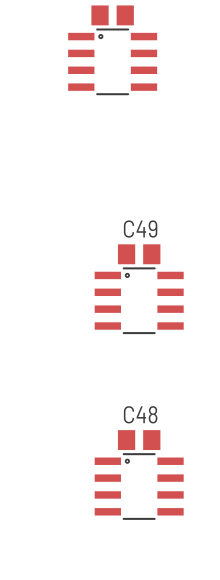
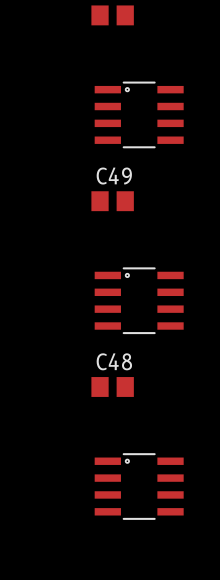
part position: (112, 61) -> (139, 114)
C49 position: (139, 254) -> (112, 201)
C48 position: (139, 440) -> (112, 386)

